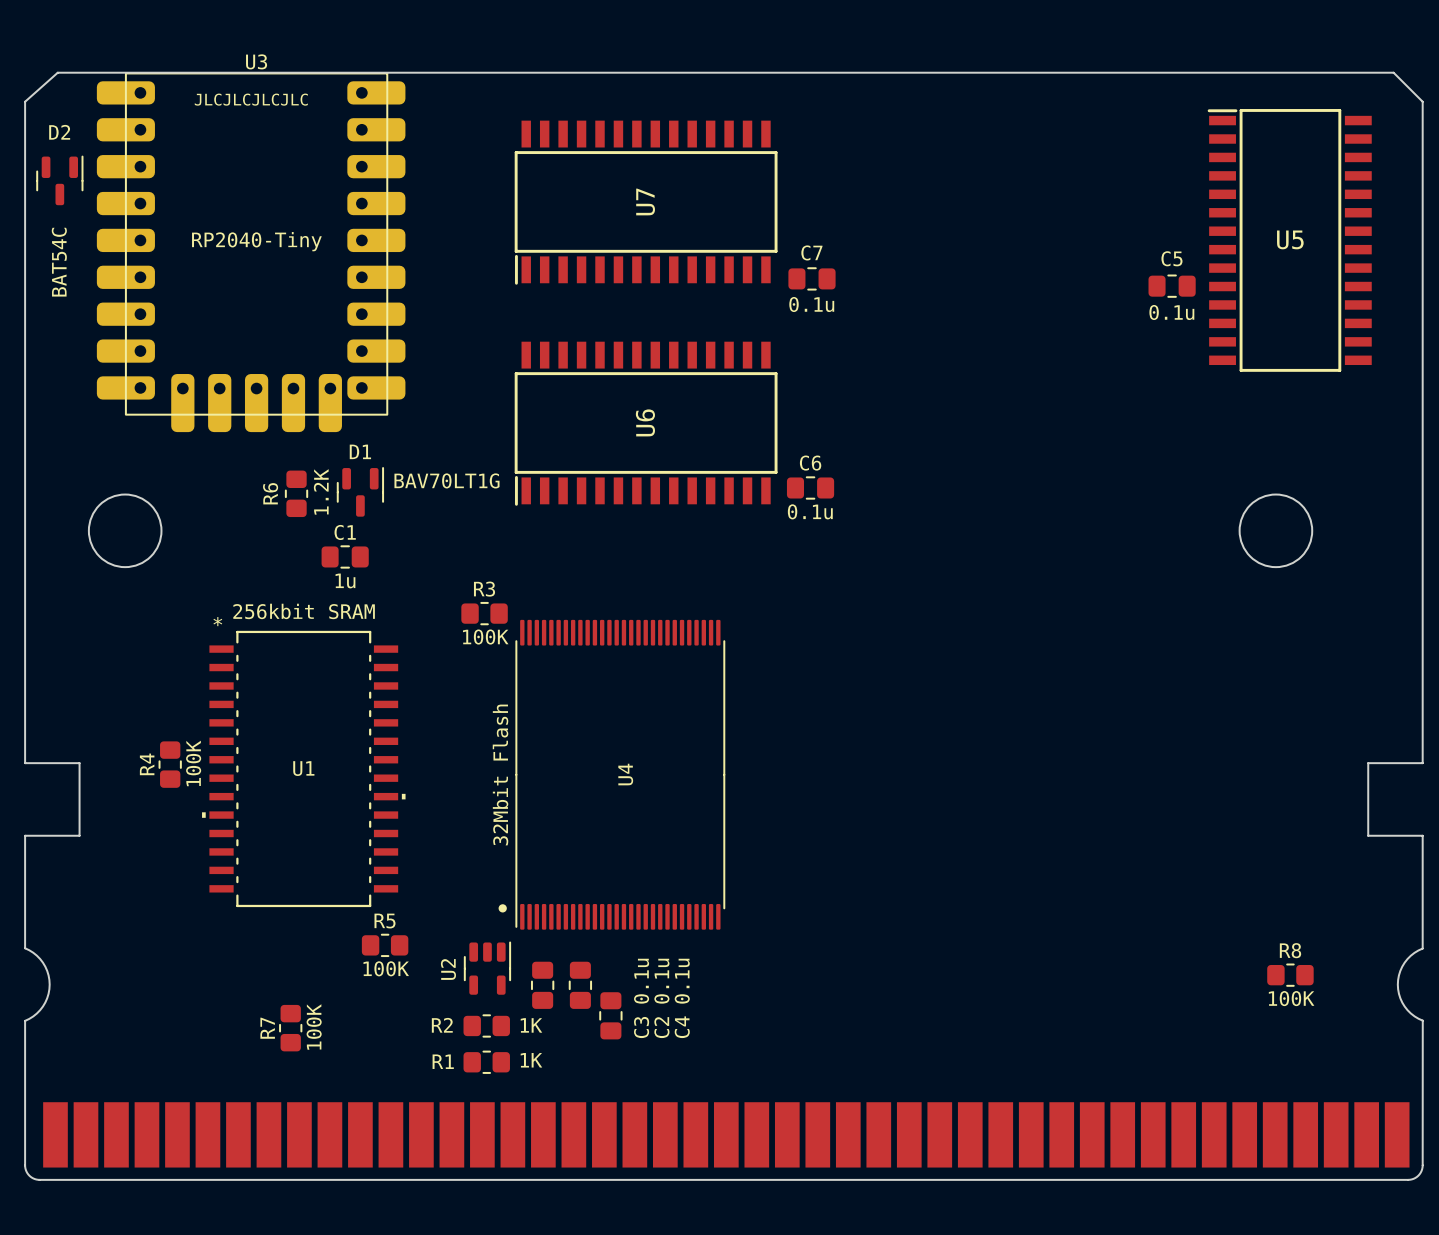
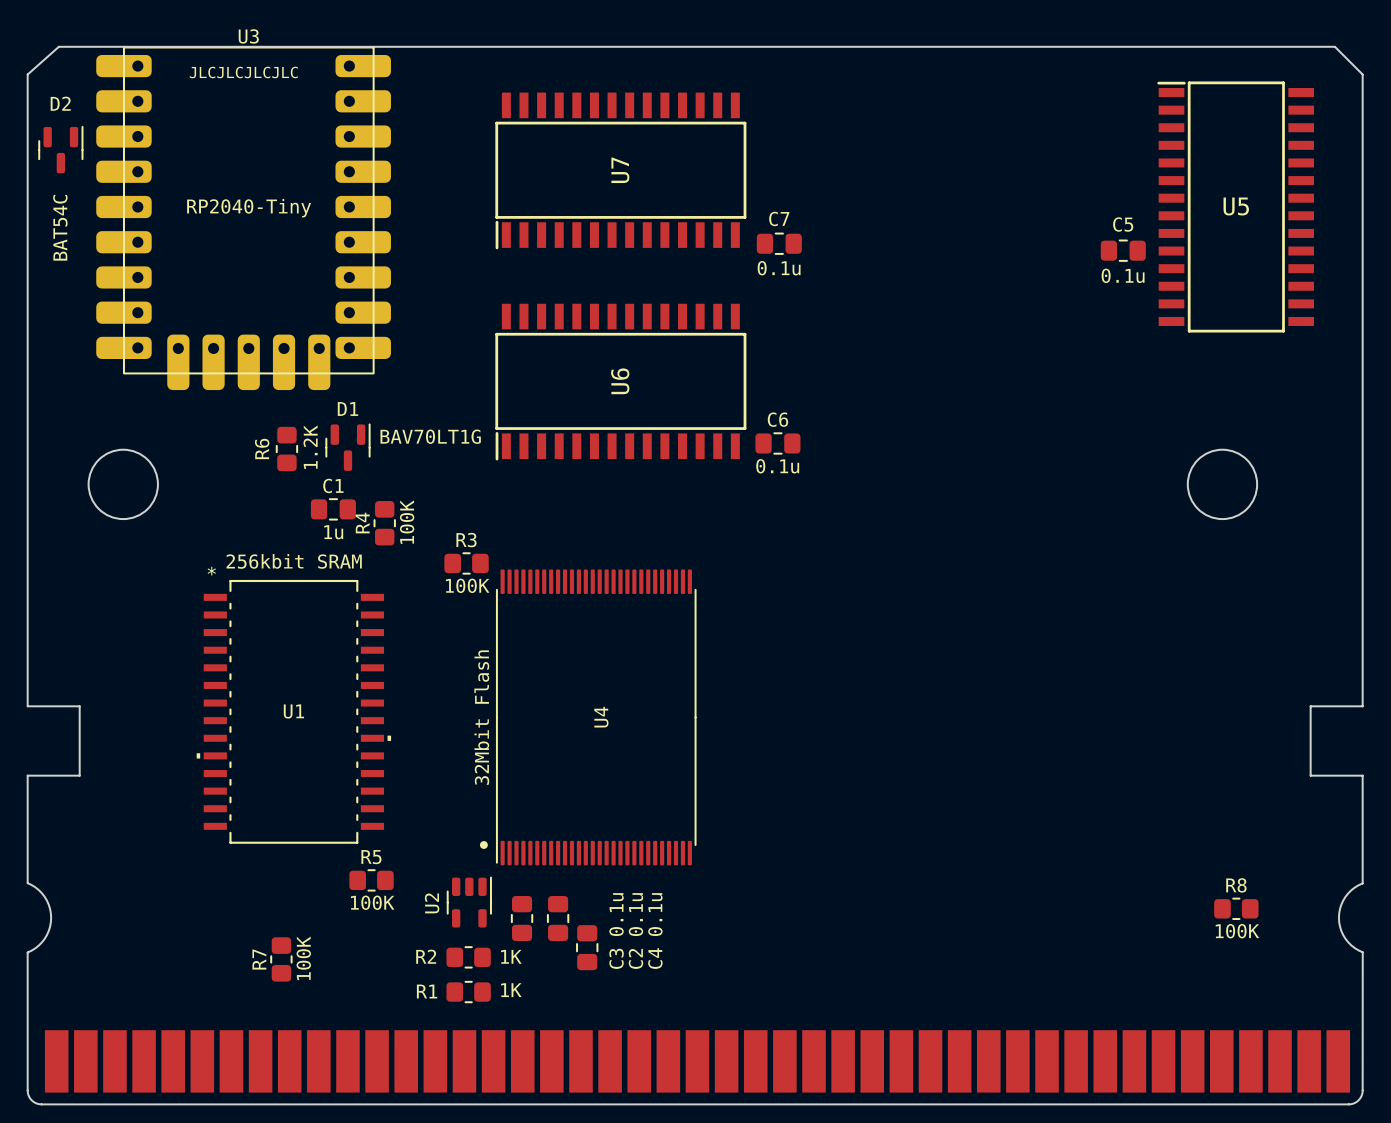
R4 position: (170, 764) -> (384, 523)

